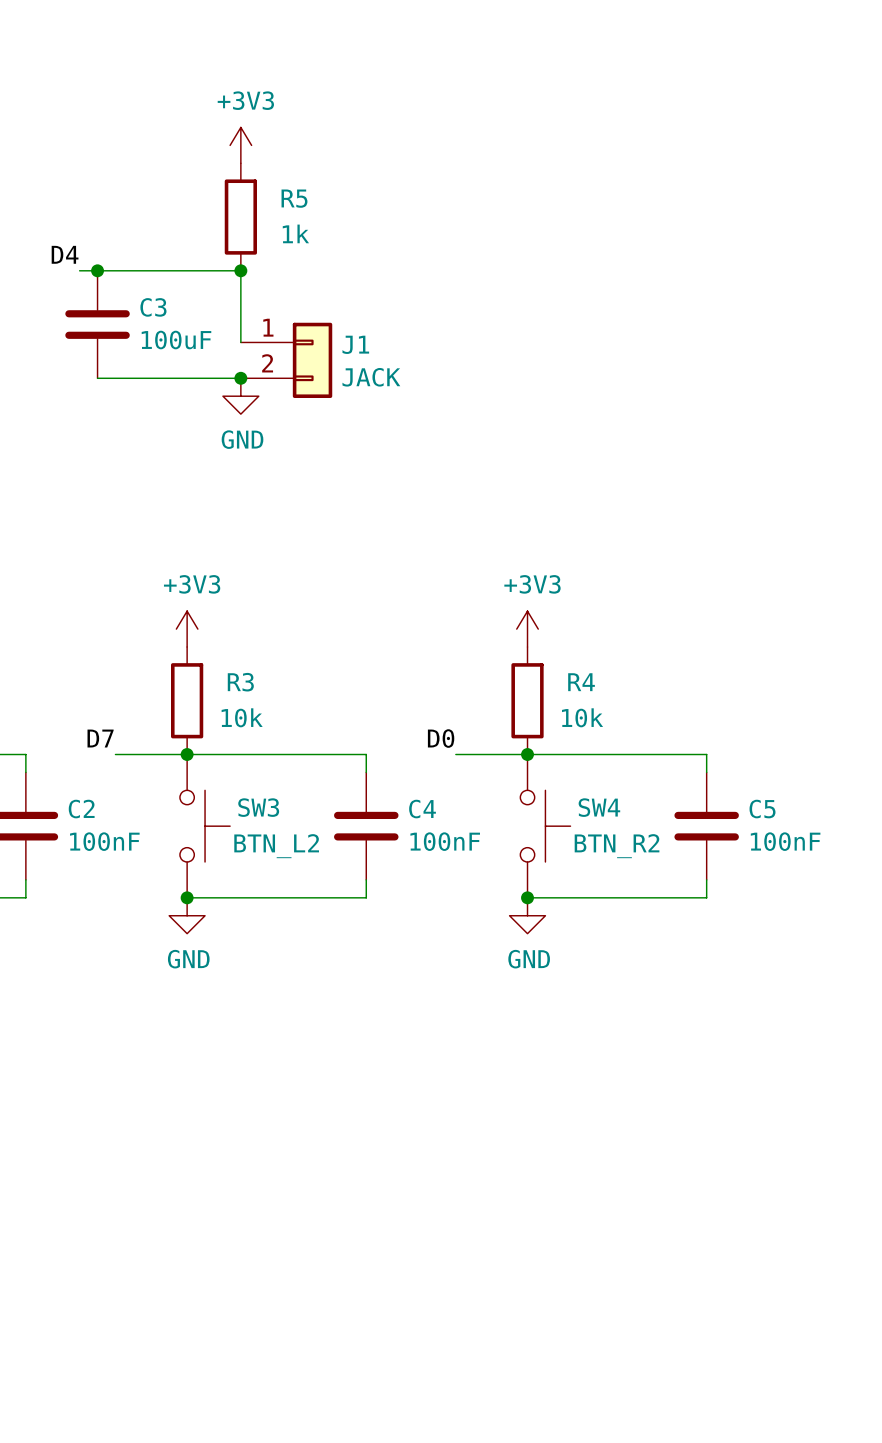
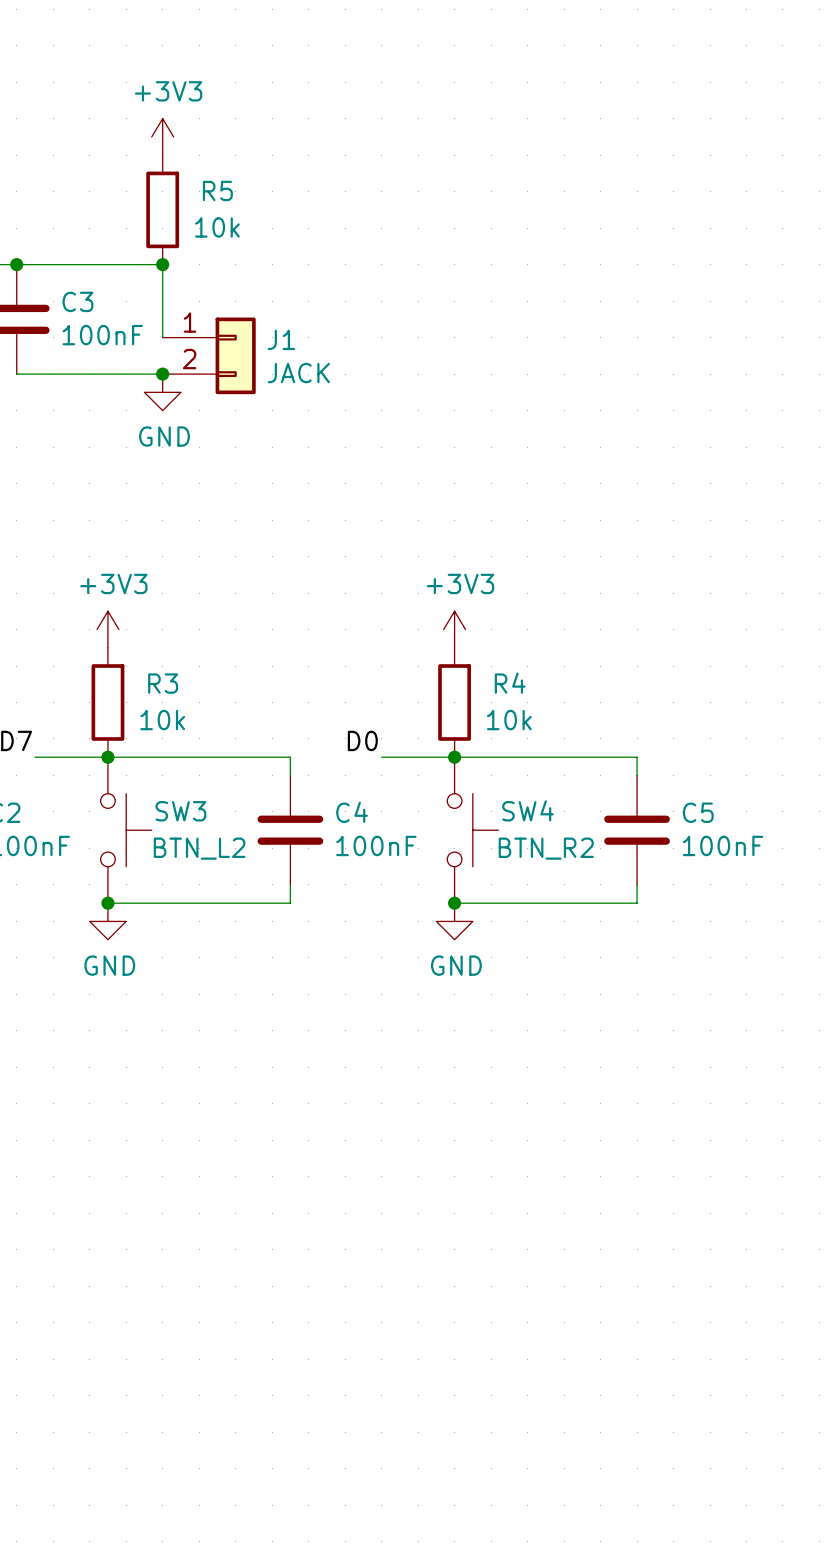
R5 value: 1k (295, 233) -> 10k (217, 227)
C3 value: 100uF (176, 340) -> 100nF (102, 335)

